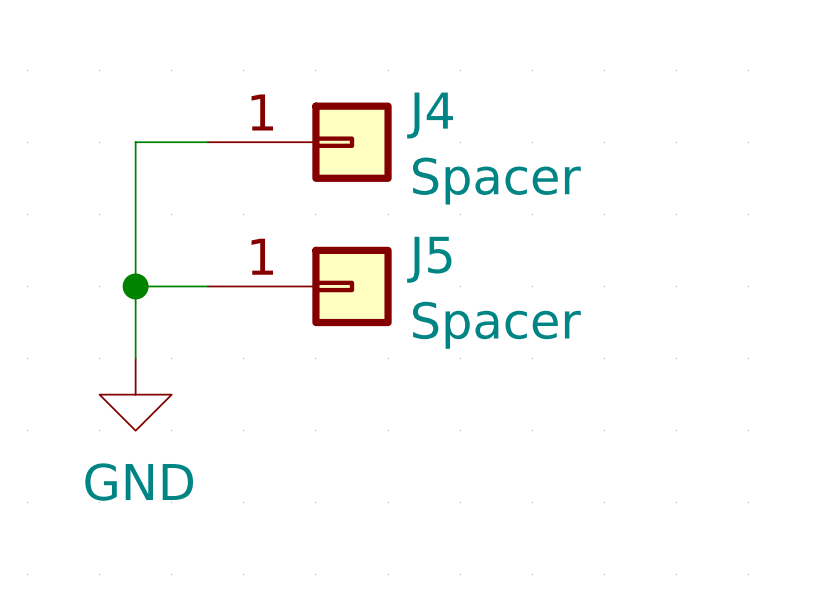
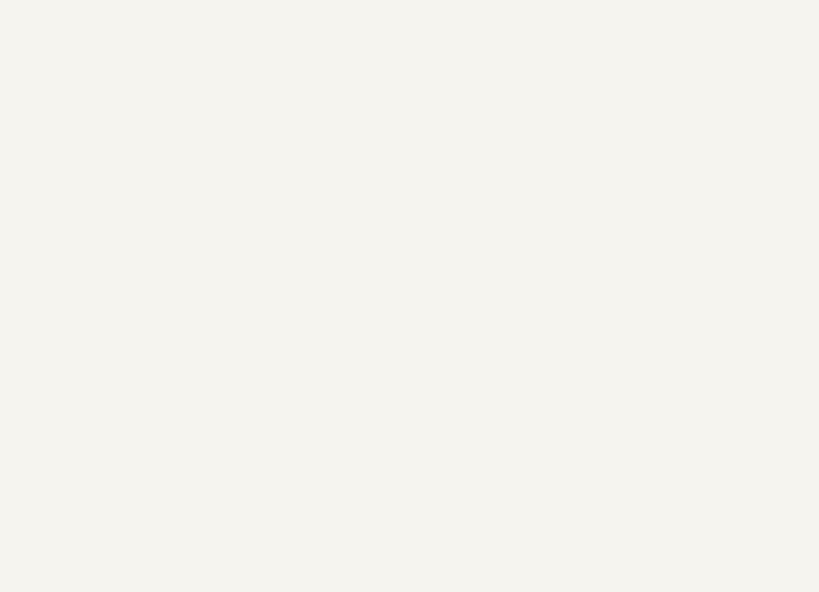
wire: (207, 142) (135, 142) (135, 358) -> none
J4: Spacer (299, 142) -> none
wire: (135, 286) (207, 286) -> none
junction: (135, 286) -> none
J5: Spacer (299, 286) -> none
power symbol: GND (135, 394) -> none

